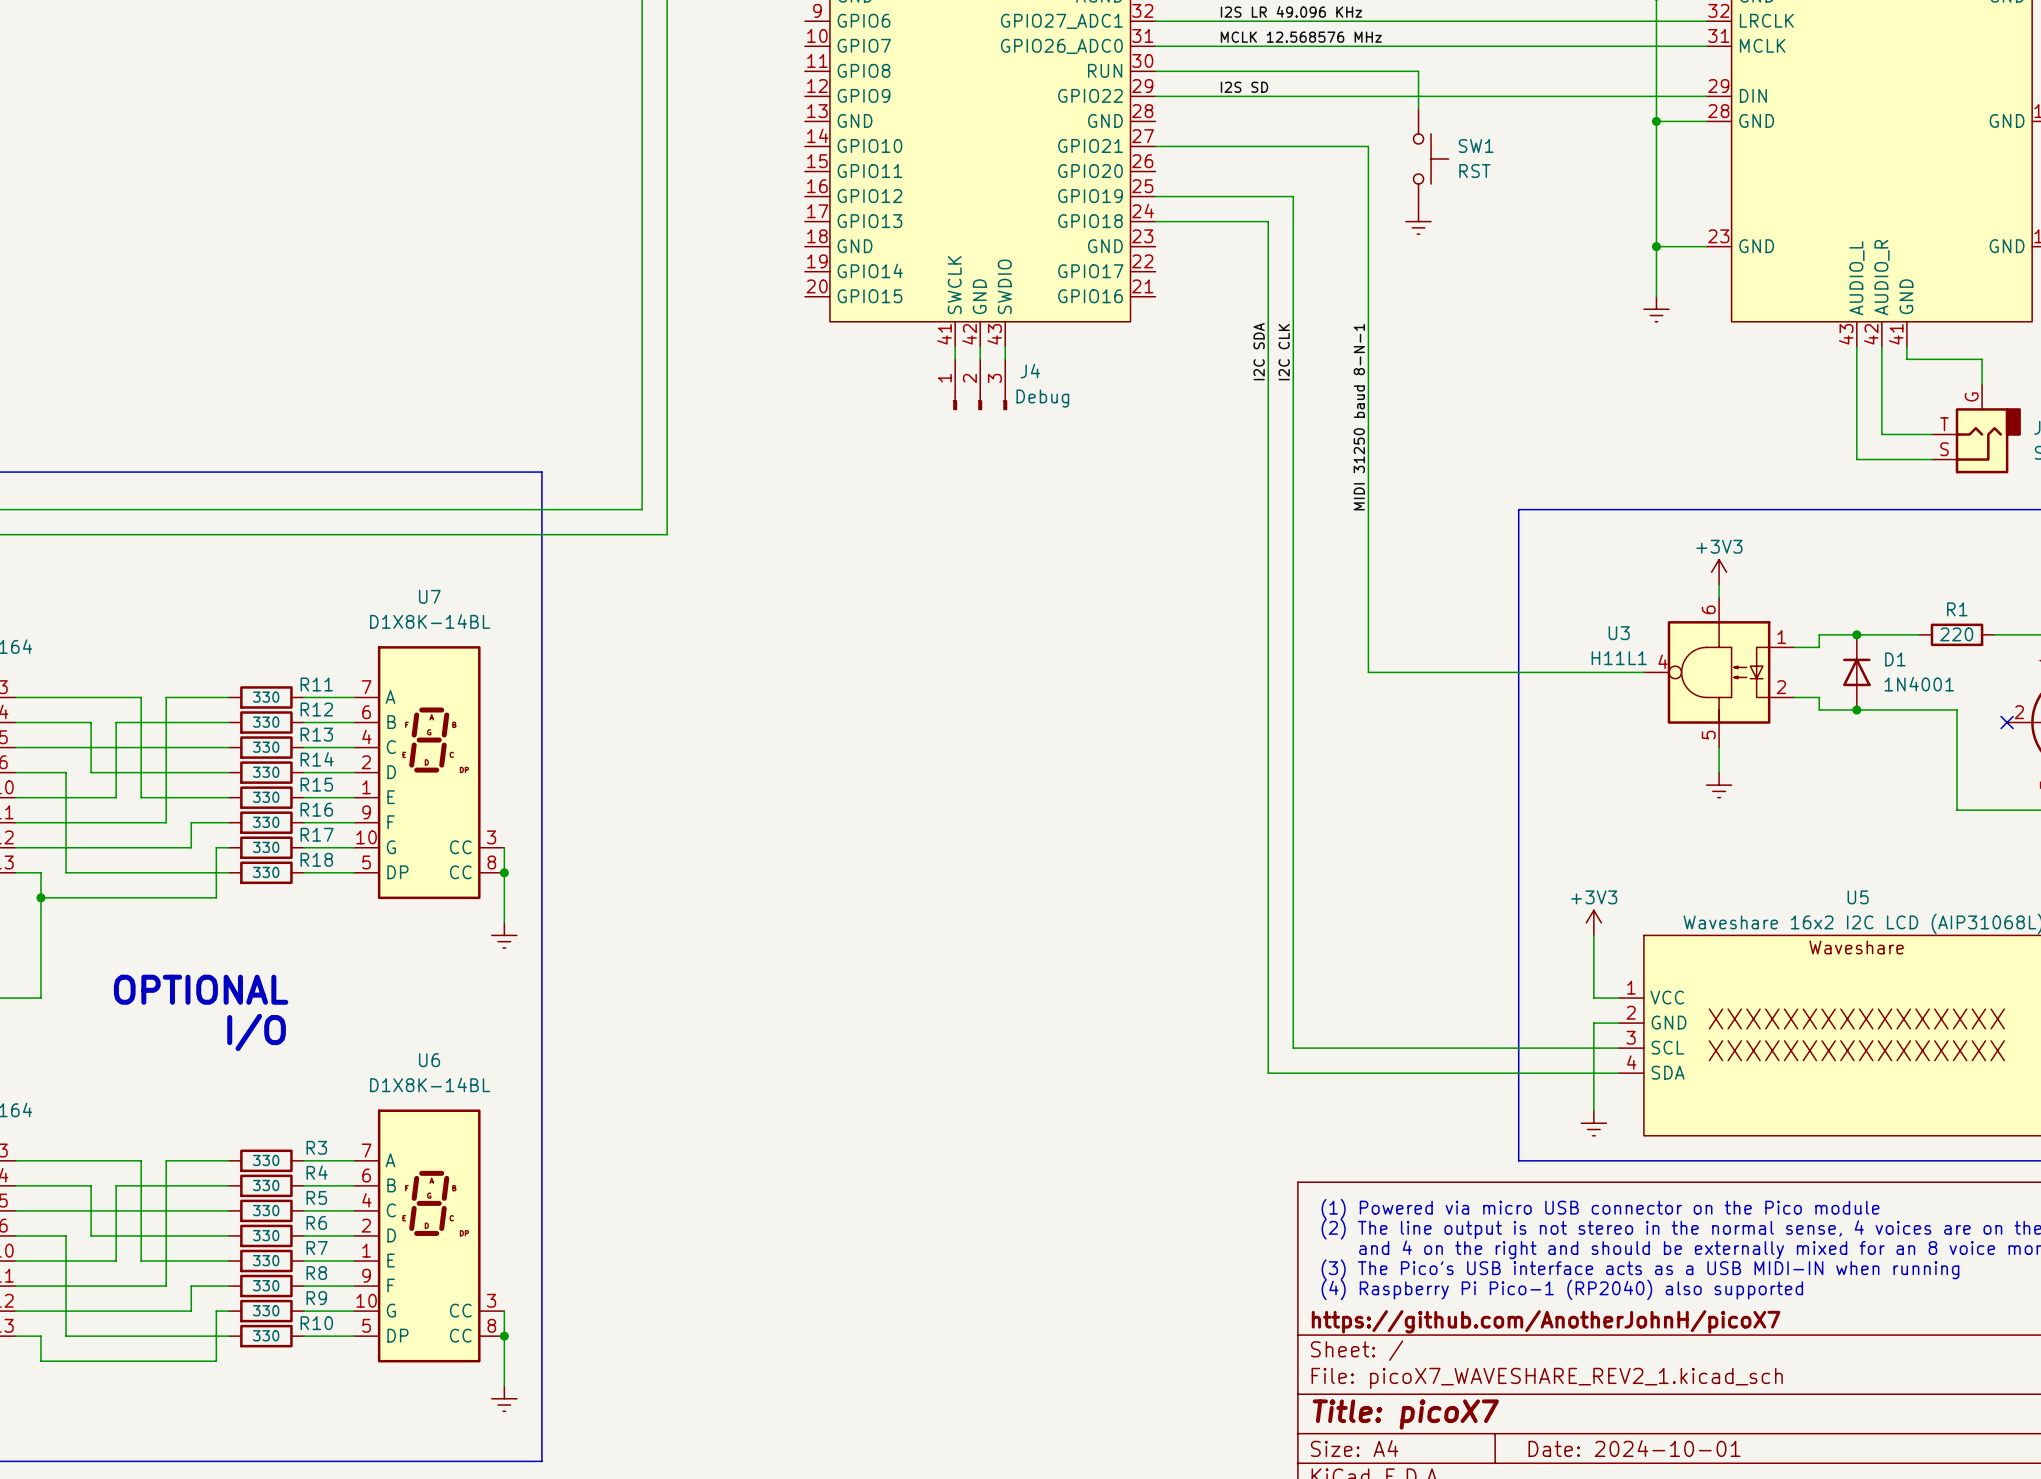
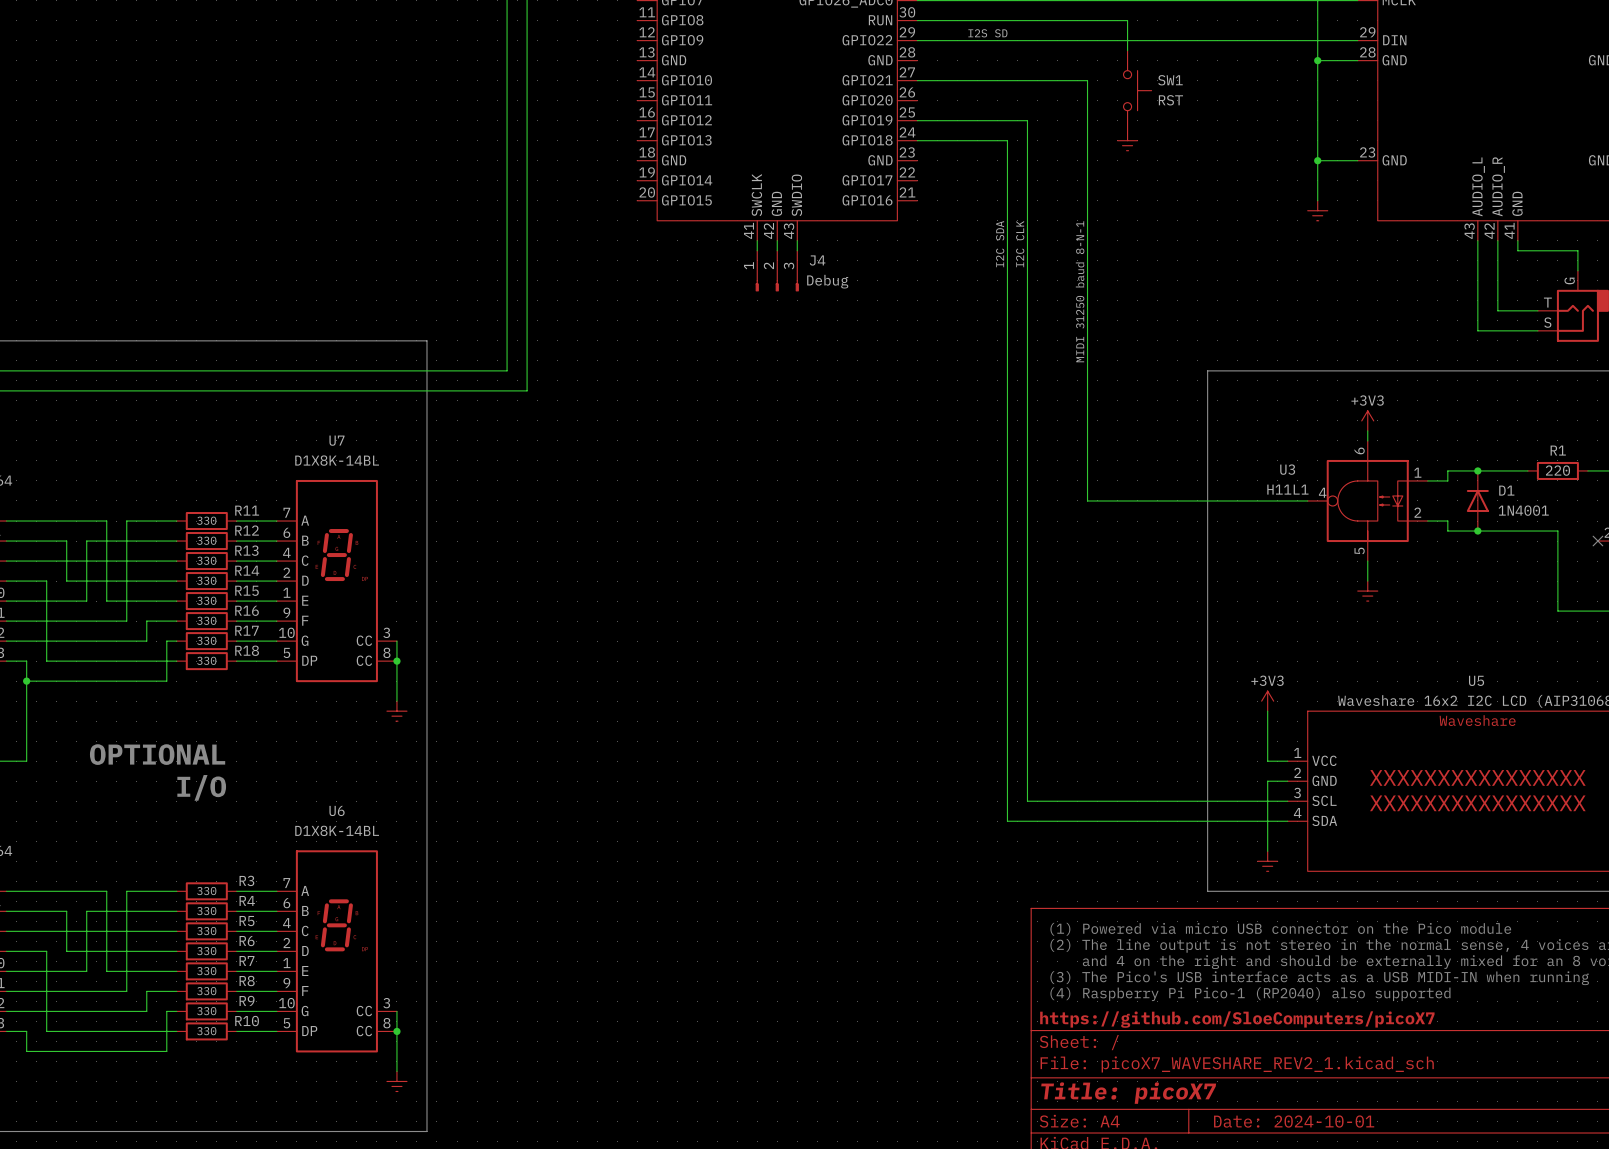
title block: https://github.com/AnotherJohnH/picoX7 (1546, 1321) -> https://github.com/SloeComputers/picoX7 (1237, 1019)

